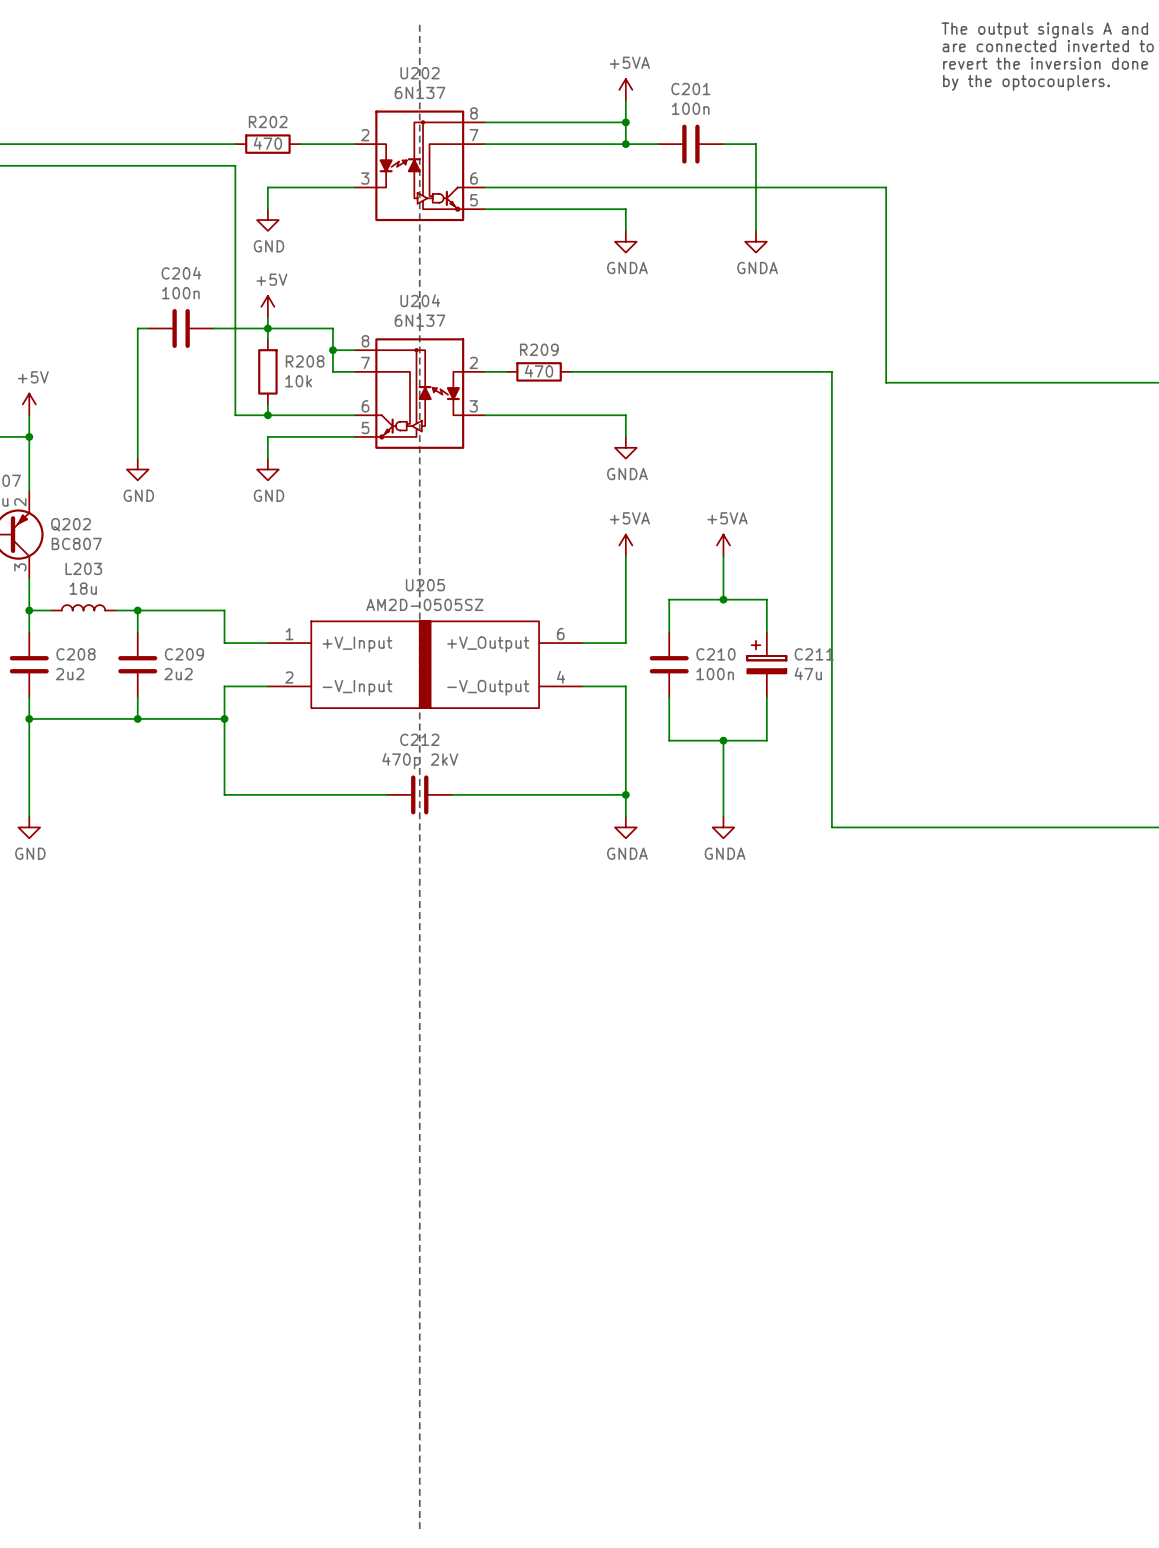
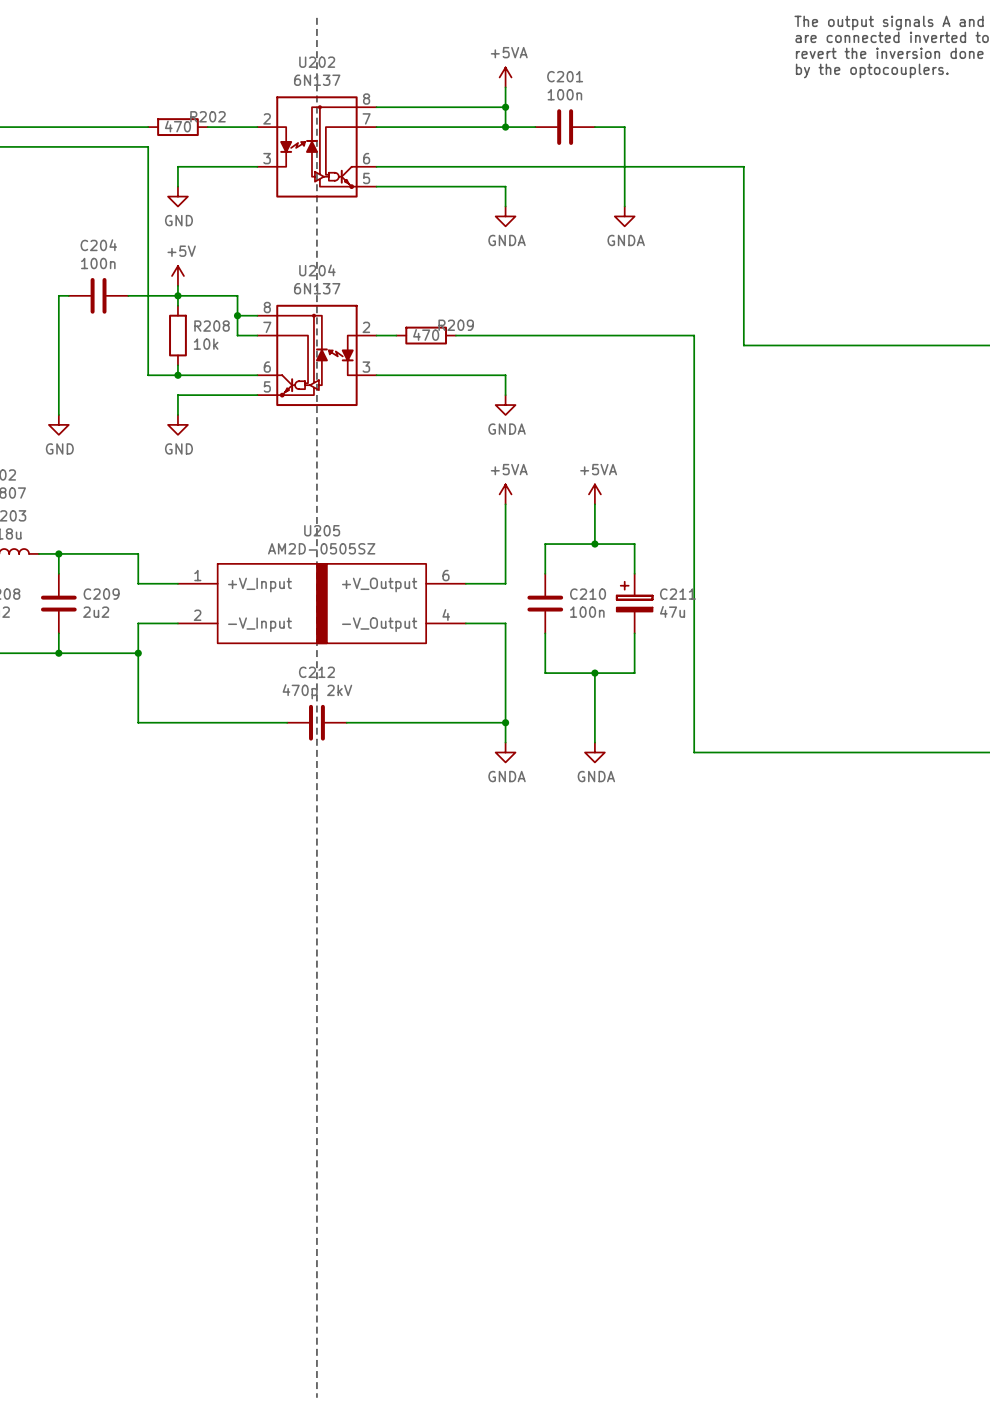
R202 name position: R202 (268, 122) -> R202 (207, 116)
R209 name position: R209 (539, 349) -> R209 (456, 325)

